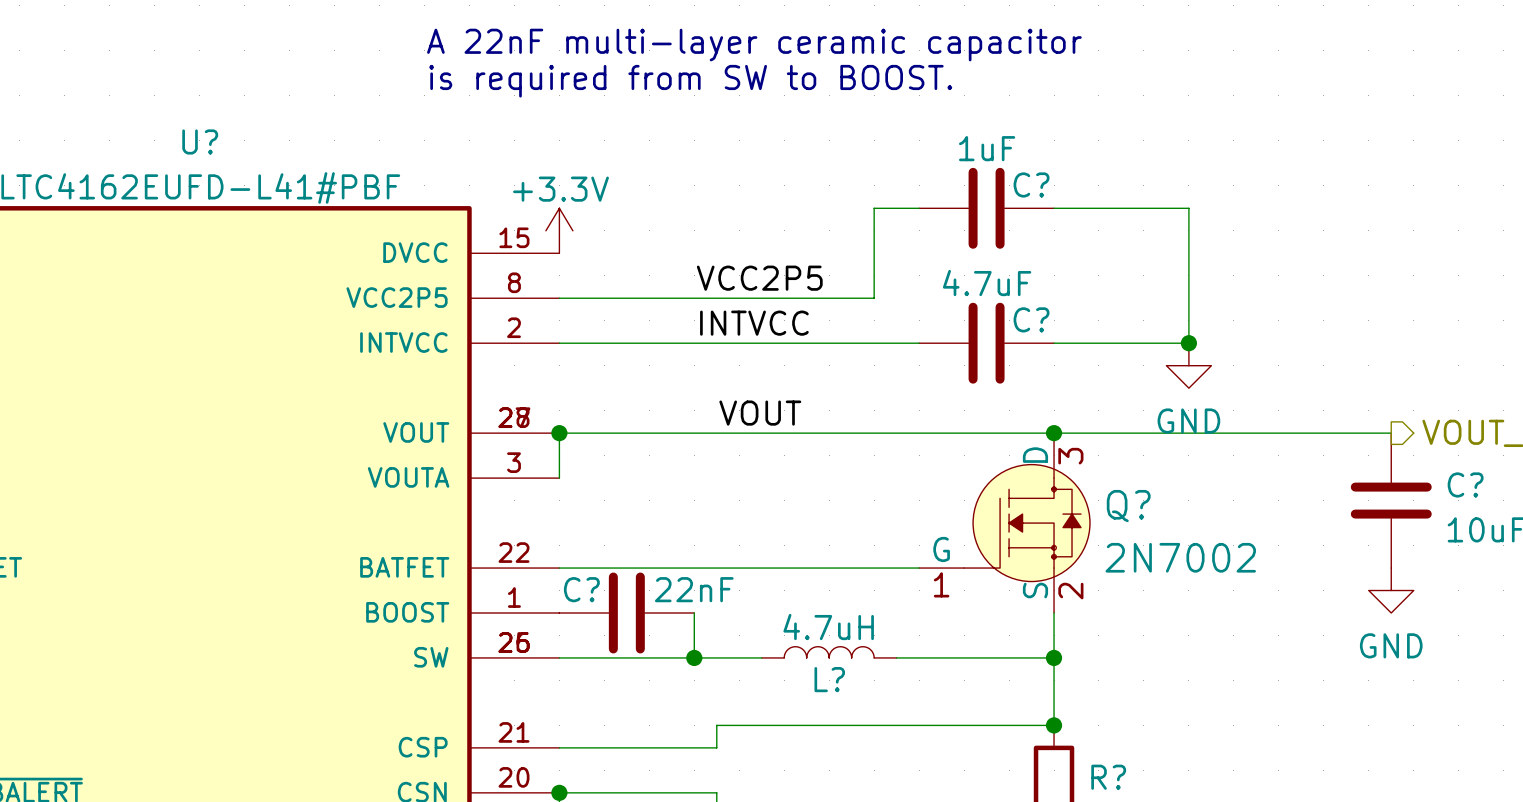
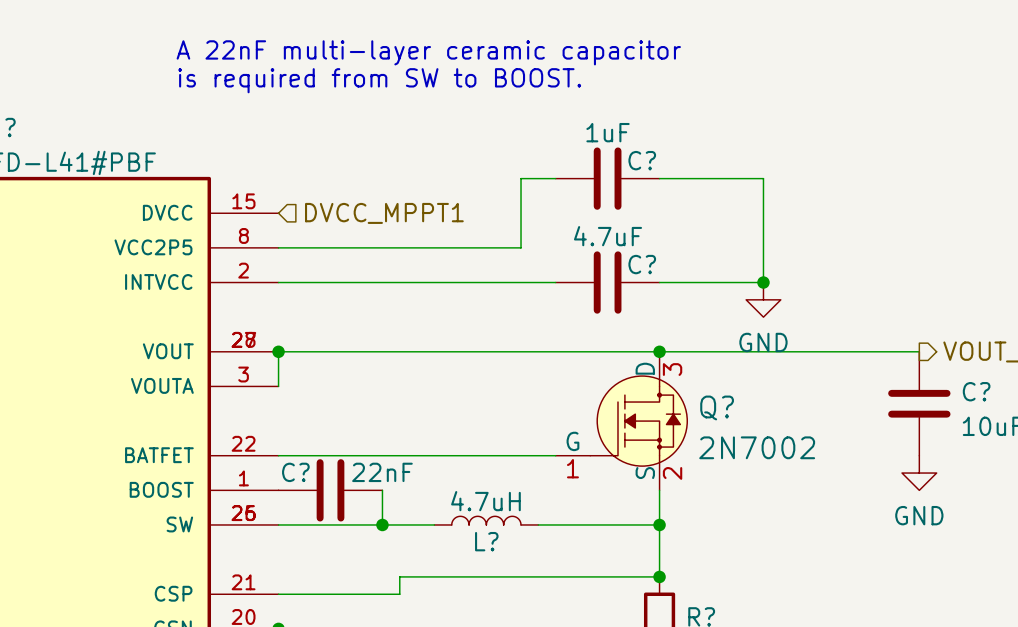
power symbol: +3.3V (559, 230) -> none
hierarchical label: none -> DVCC_MPPT1 (384, 213)
label: VCC2P5 (759, 278) -> none
label: INTVCC (754, 323) -> none
label: VOUT (760, 413) -> none

